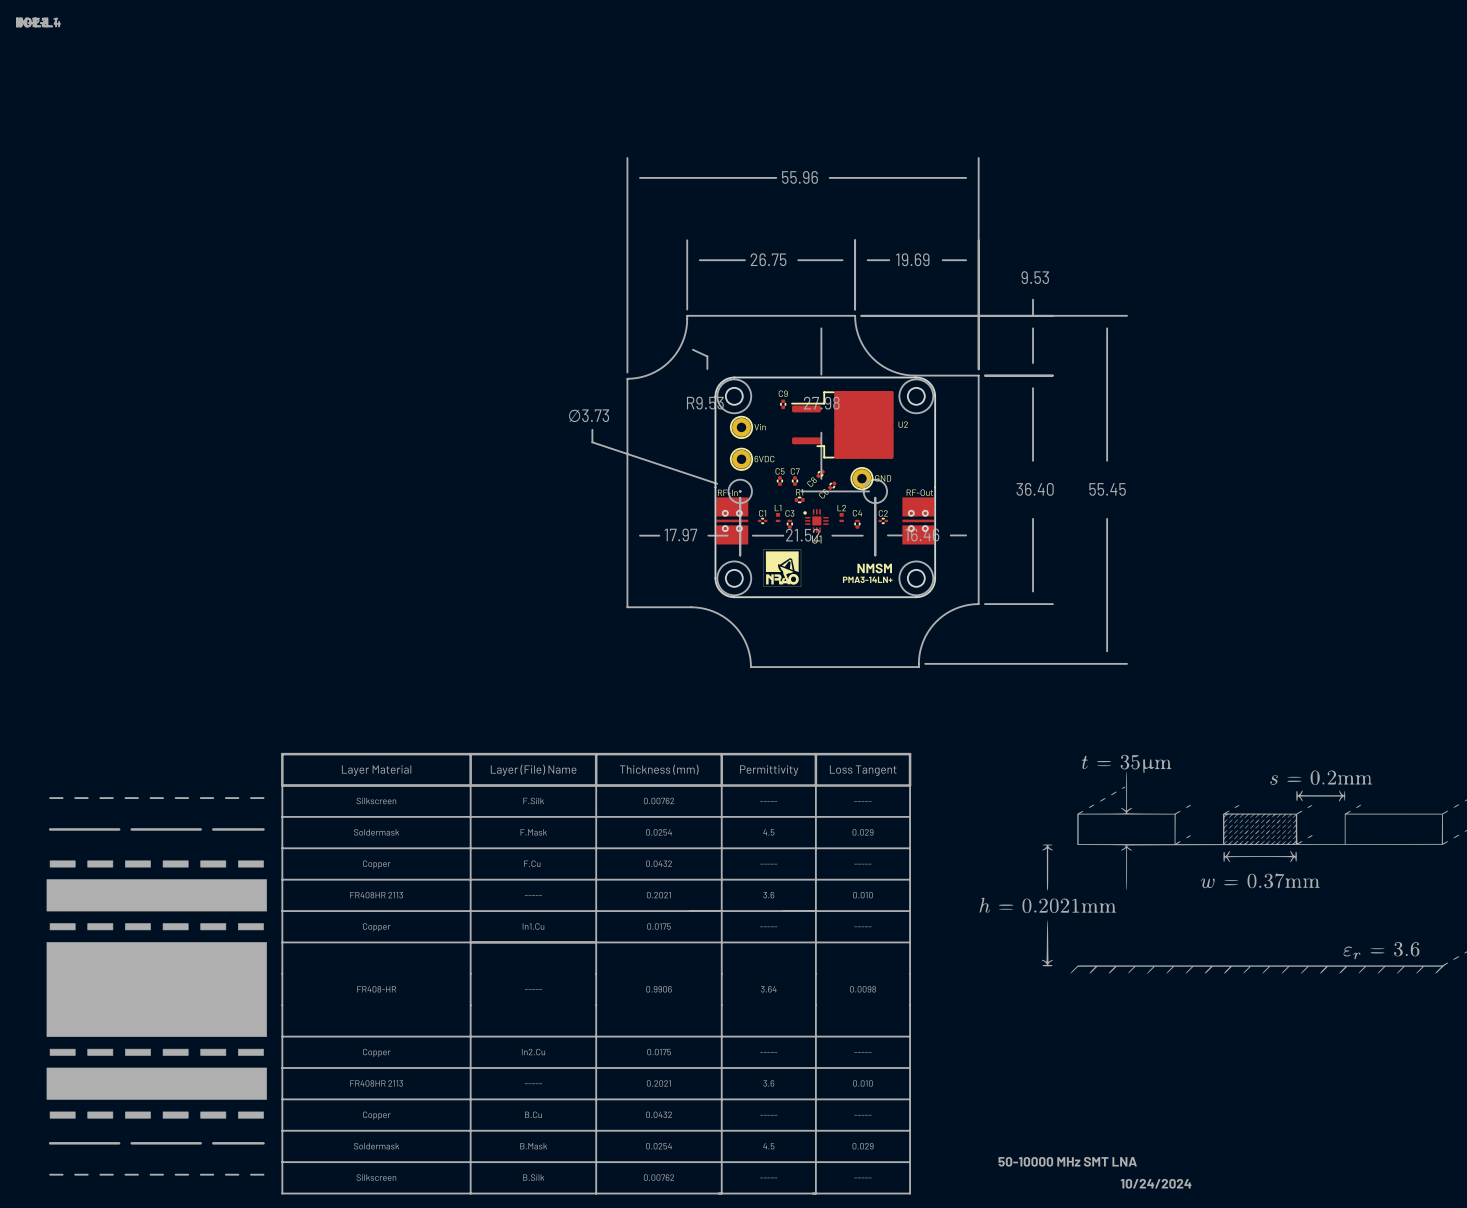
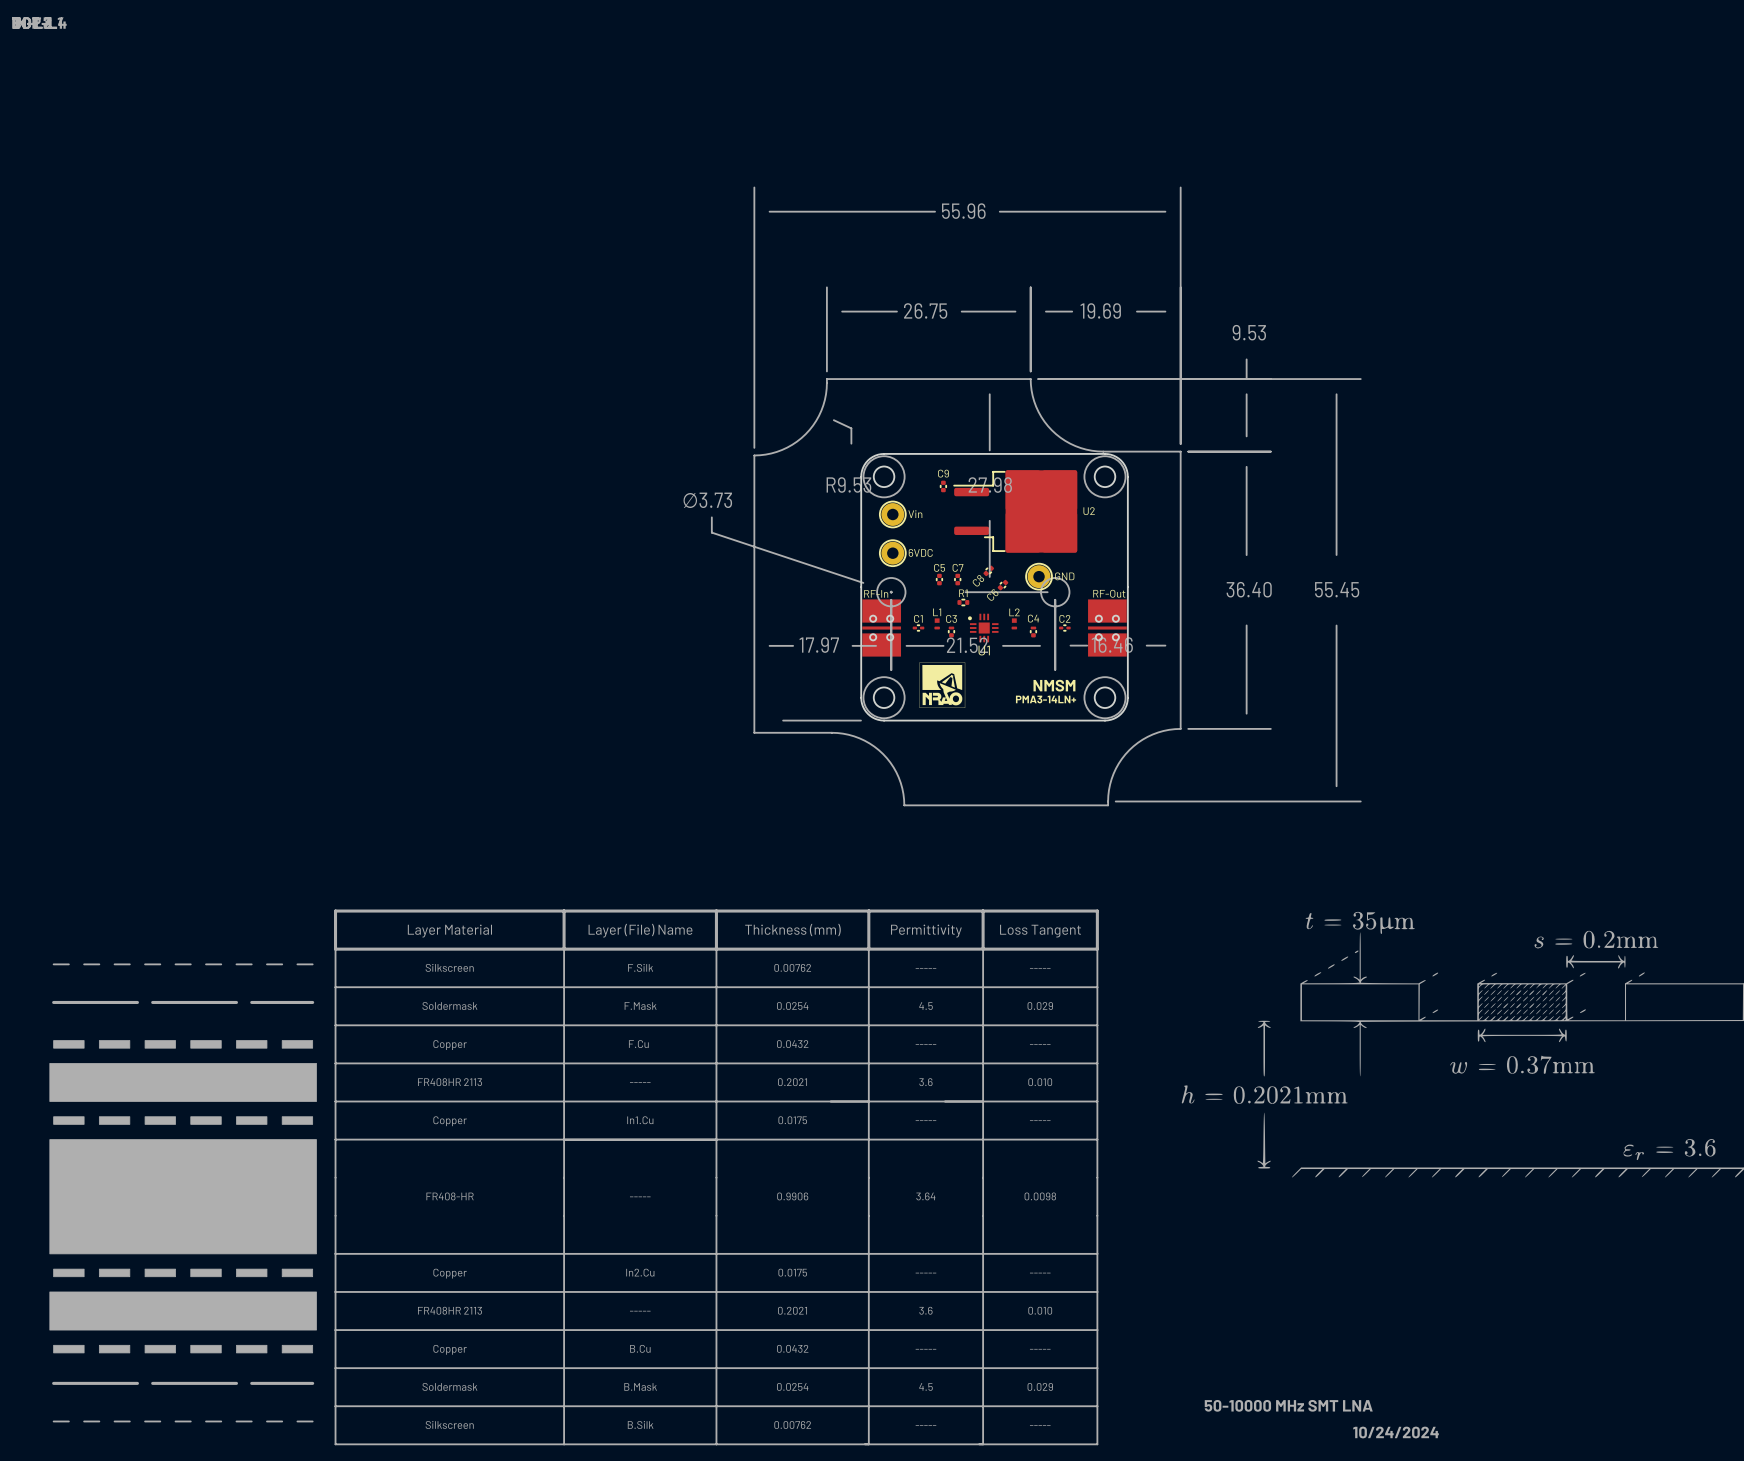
line: none -> (783, 720) (860, 720)

